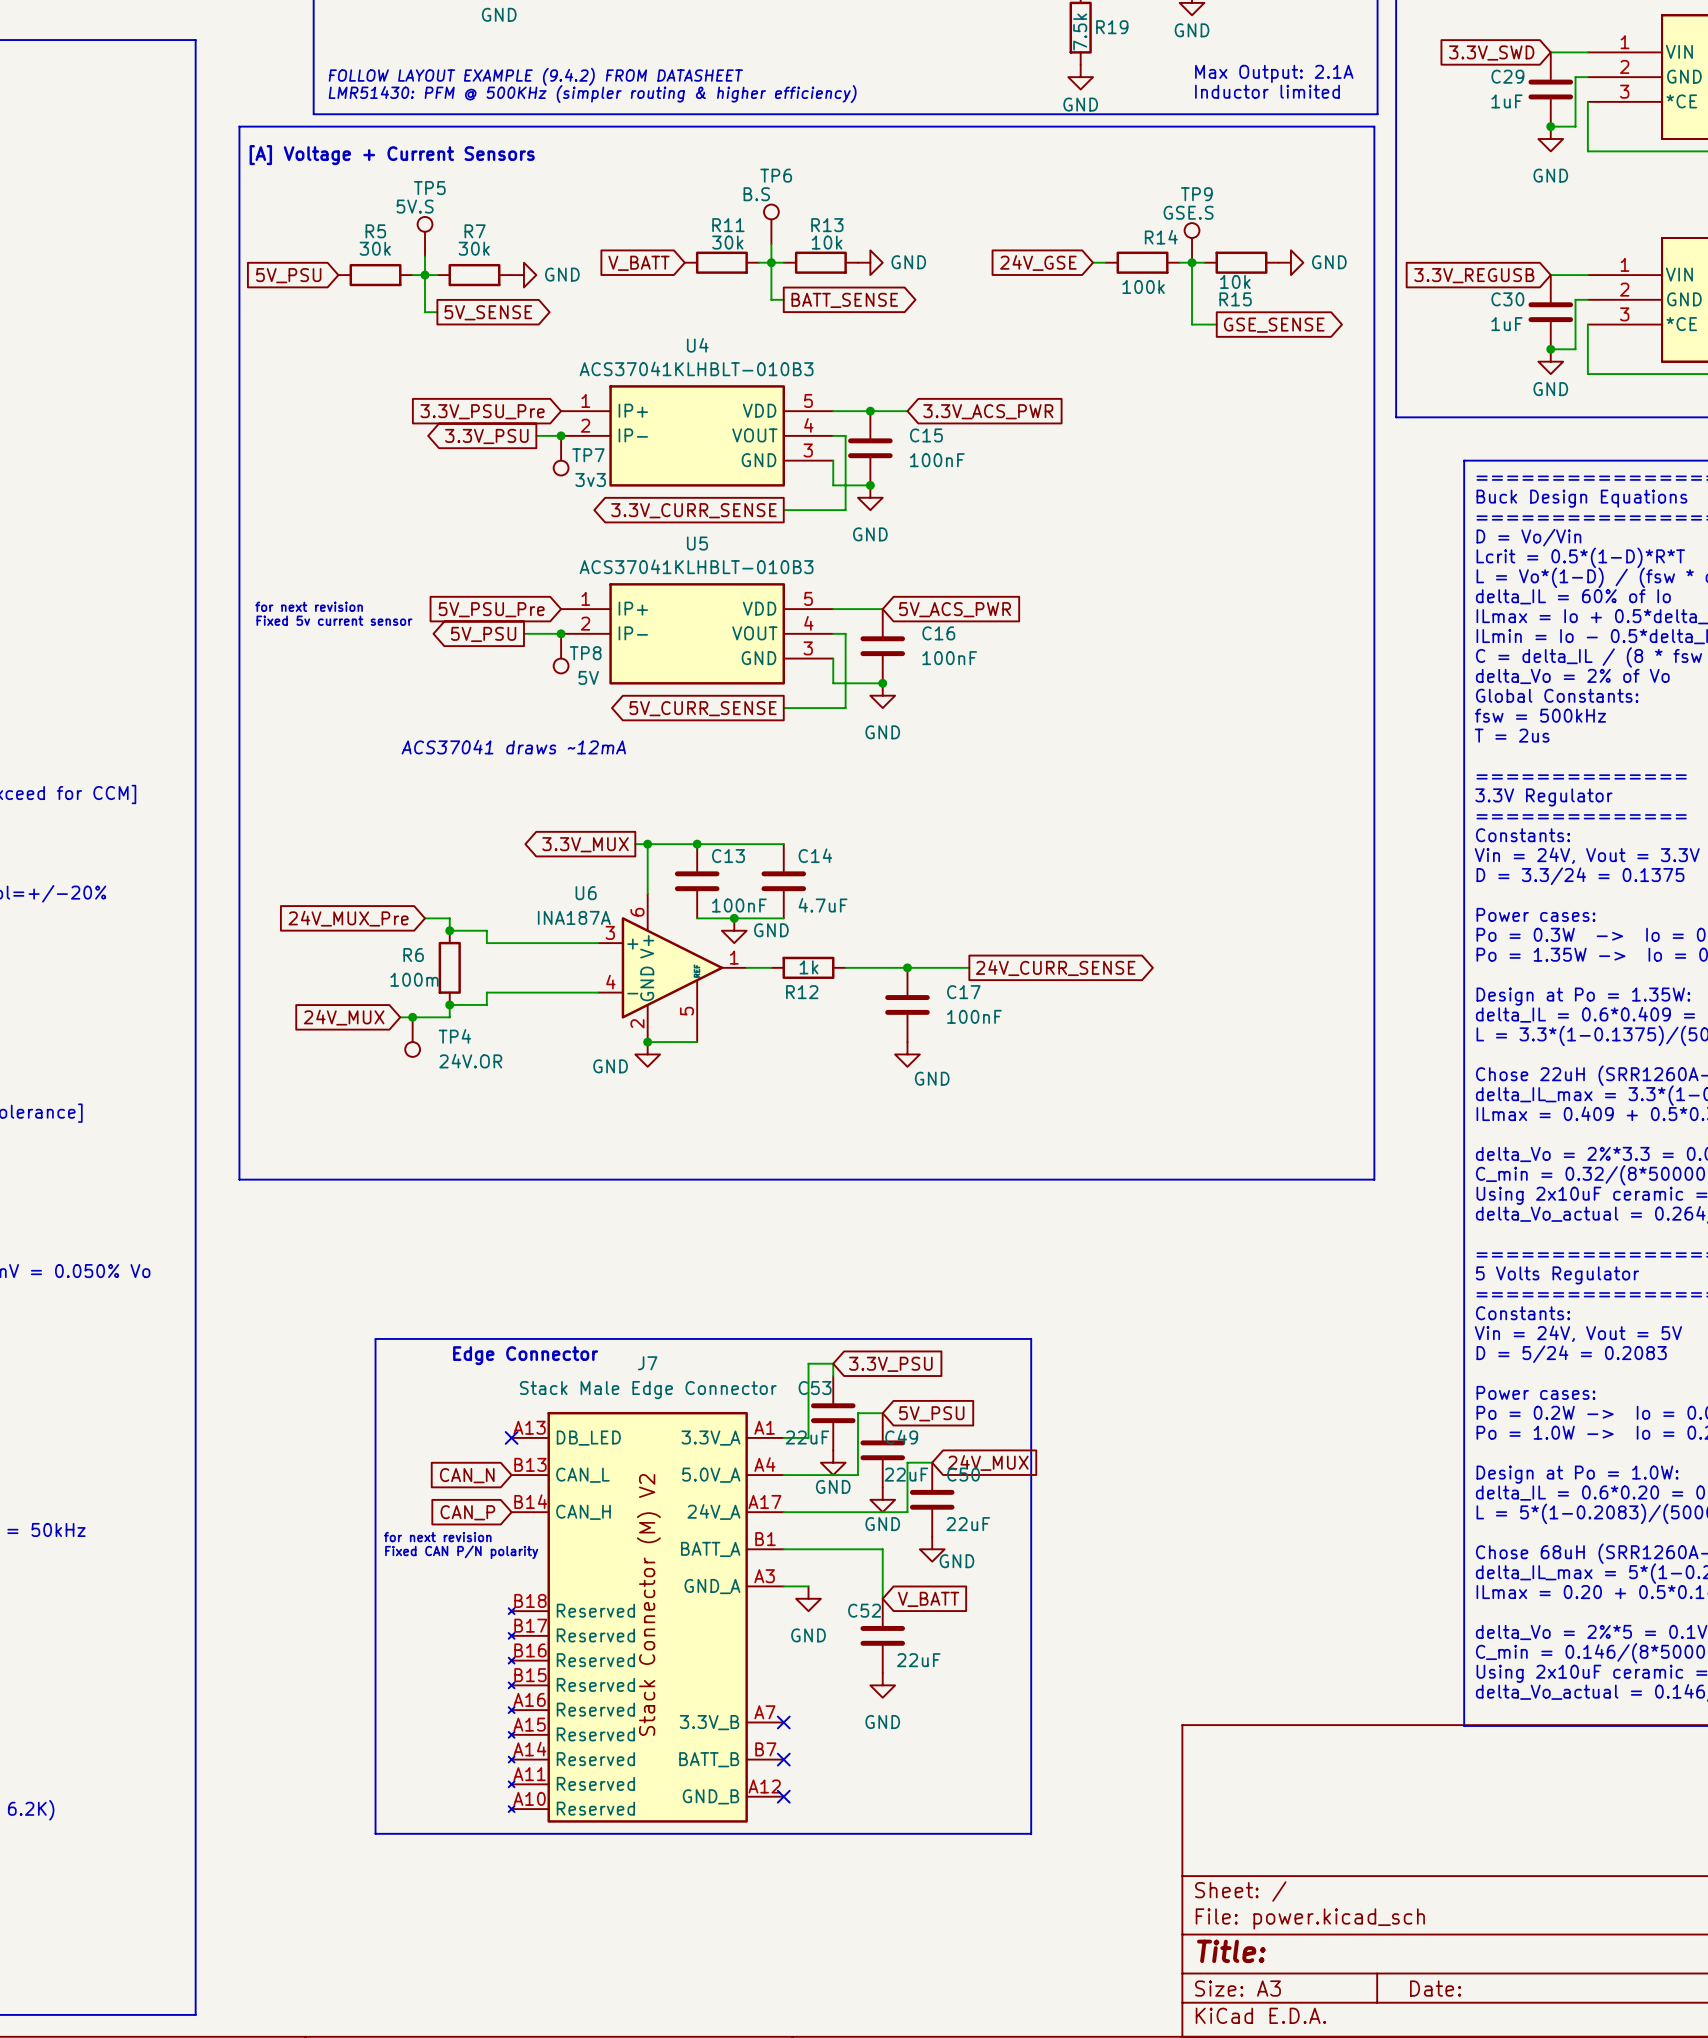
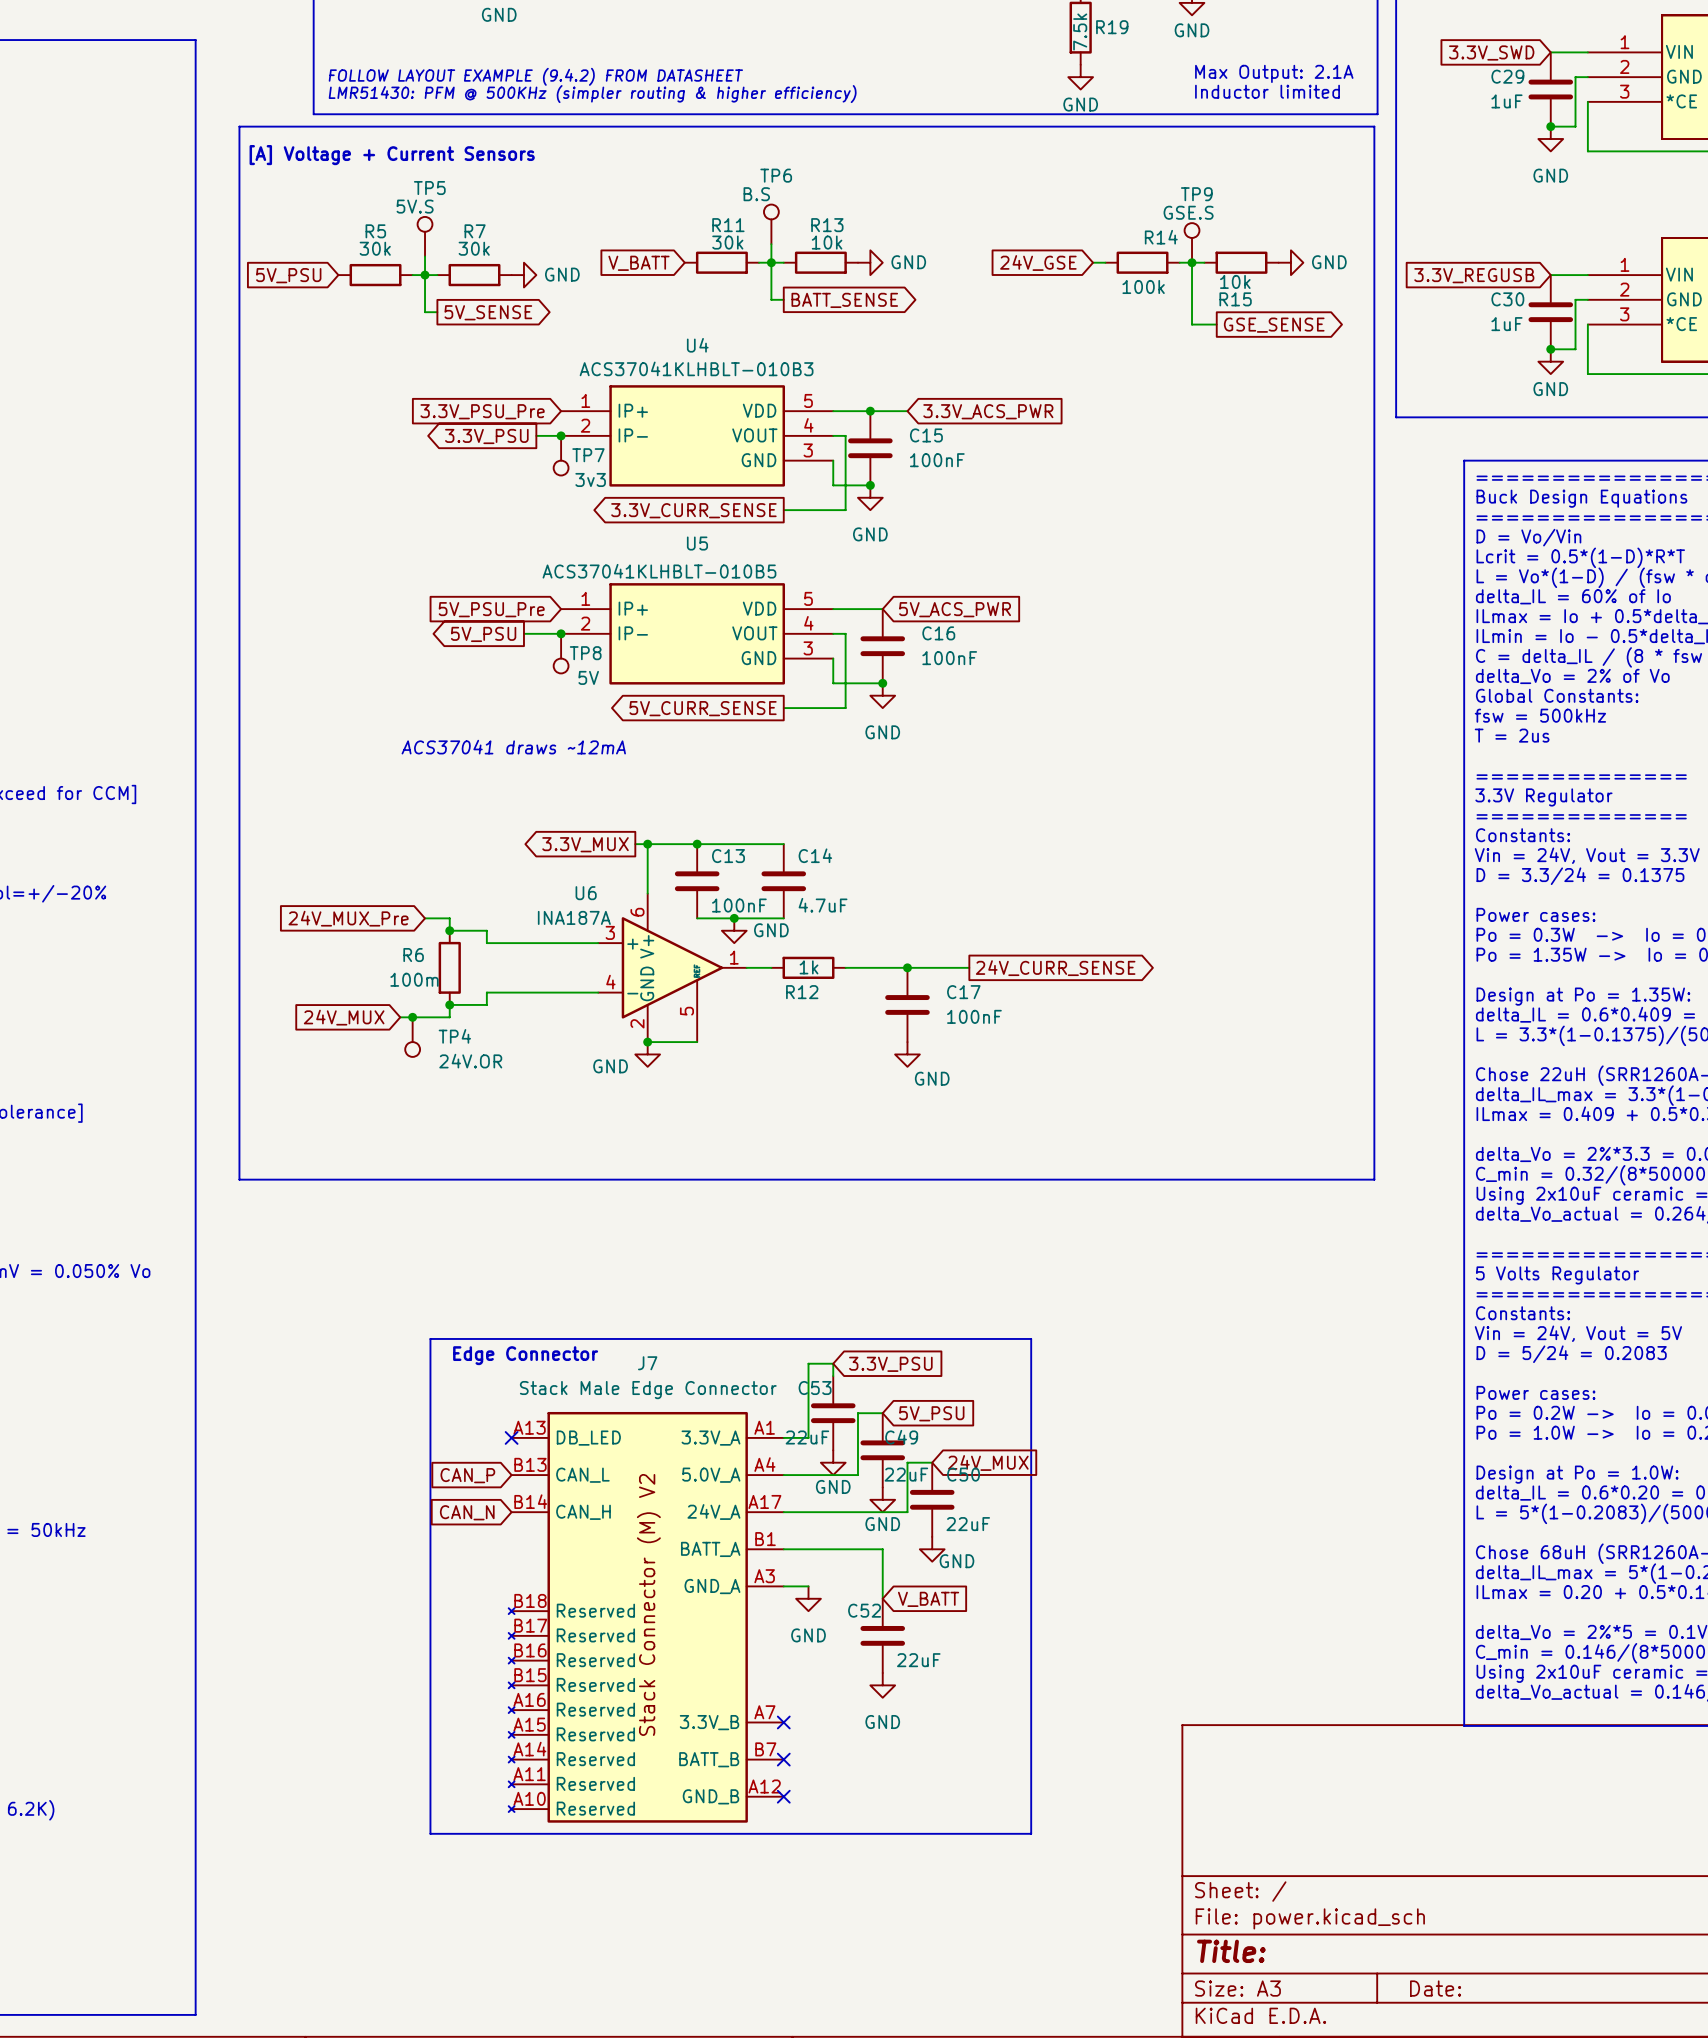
U5 value: ACS37041KLHBLT-010B3 (696, 566) -> ACS37041KLHBLT-010B5 (659, 571)
text: for next revision (309, 606) -> none
text: Fixed 5v current sensor (334, 620) -> none
line: (430, 1338) (375, 1338) (375, 1833) (430, 1833) -> (430, 1338) (430, 1833)
global label: CAN_N (467, 1475) -> CAN_P (467, 1475)
global label: CAN_P (467, 1512) -> CAN_N (467, 1512)
text: for next revision (437, 1537) -> none
text: Fixed CAN P/N polarity (461, 1552) -> none

